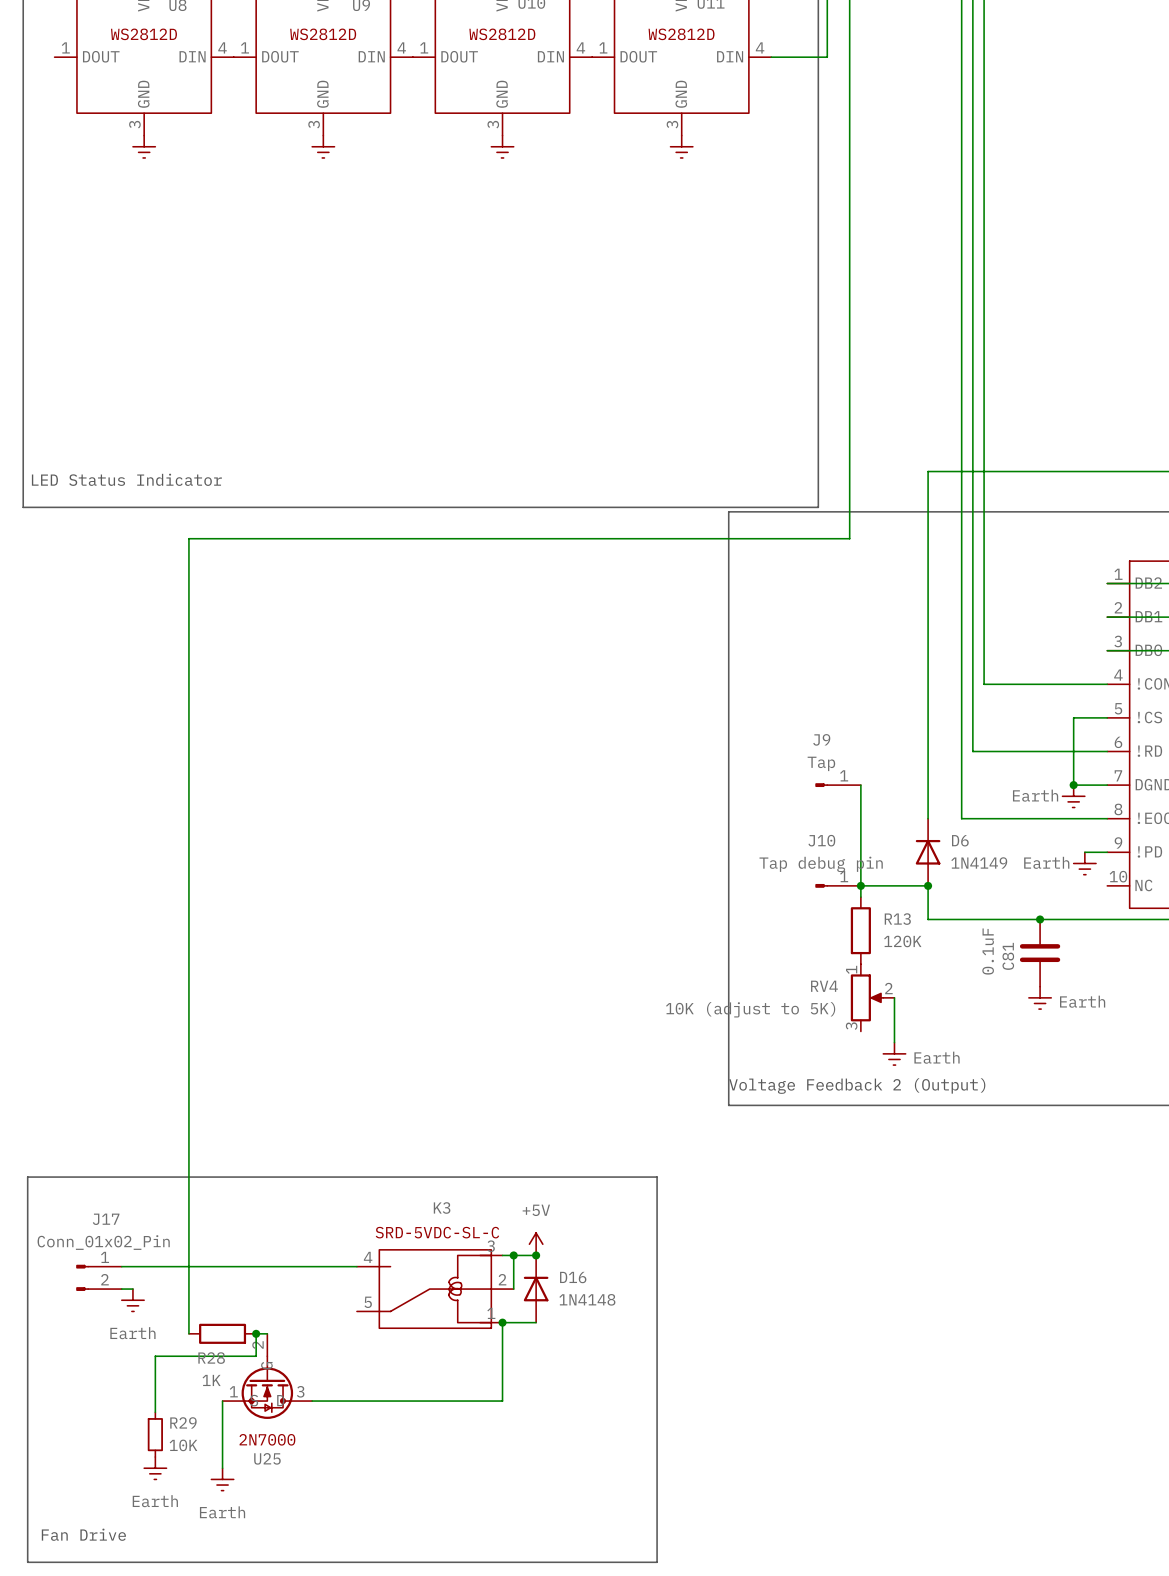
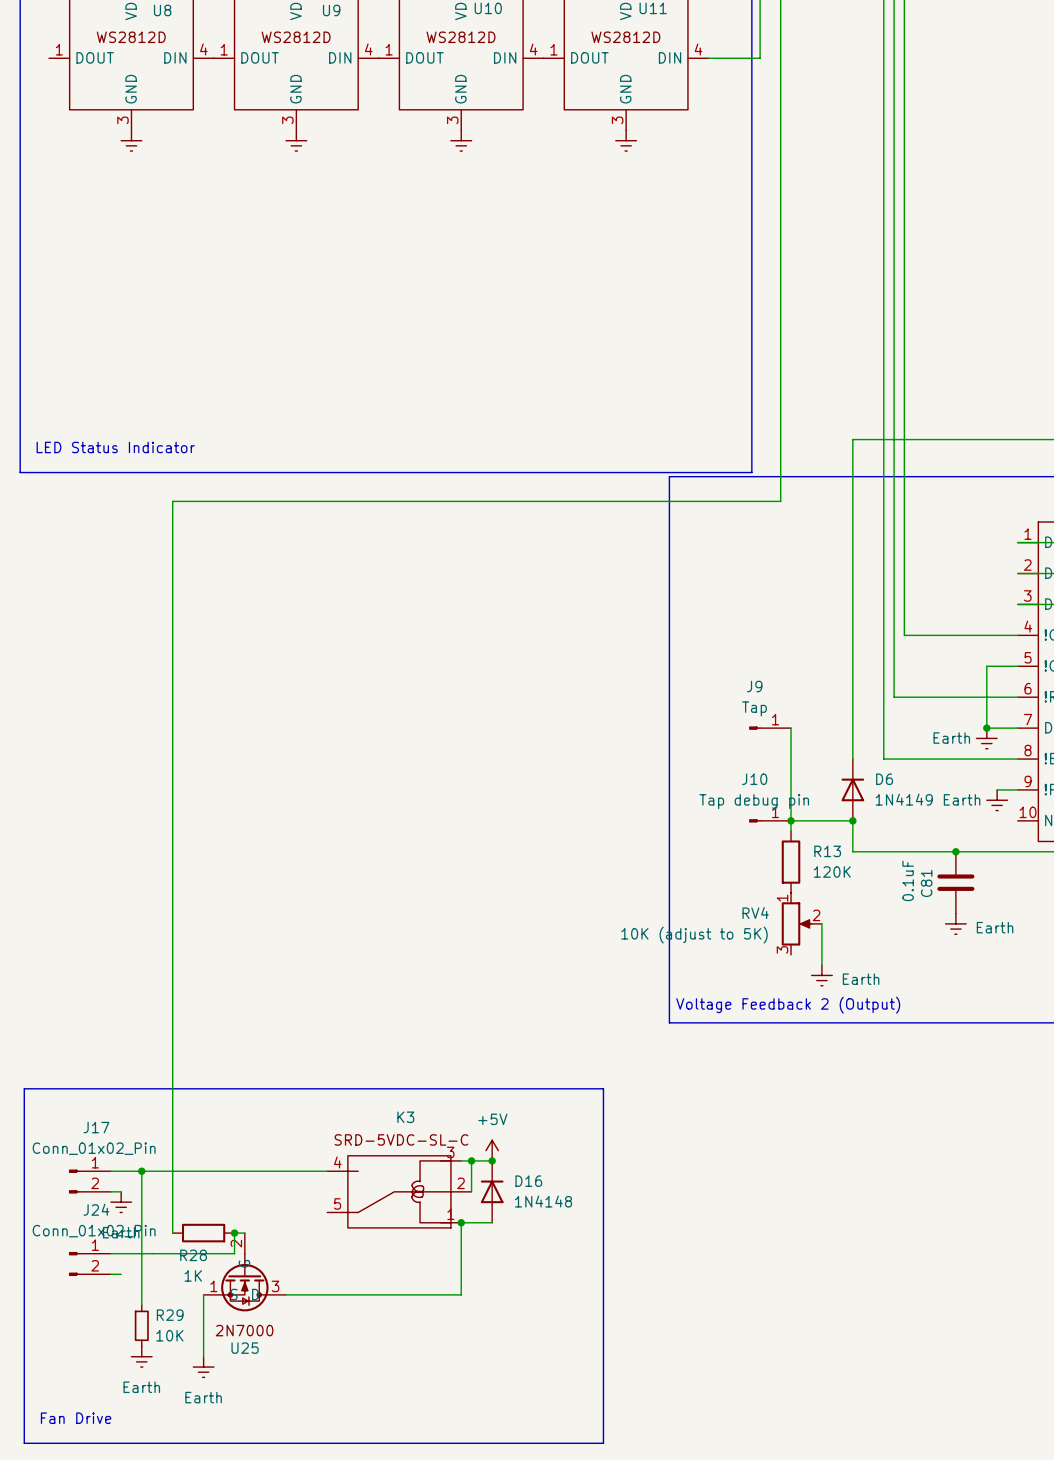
wire: none -> (141, 1171) (141, 1253) (110, 1253)
junction: none -> (141, 1171)
J24: none -> Conn_01x02_Pin (89, 1263)
wire: none -> (110, 1274) (121, 1274)

